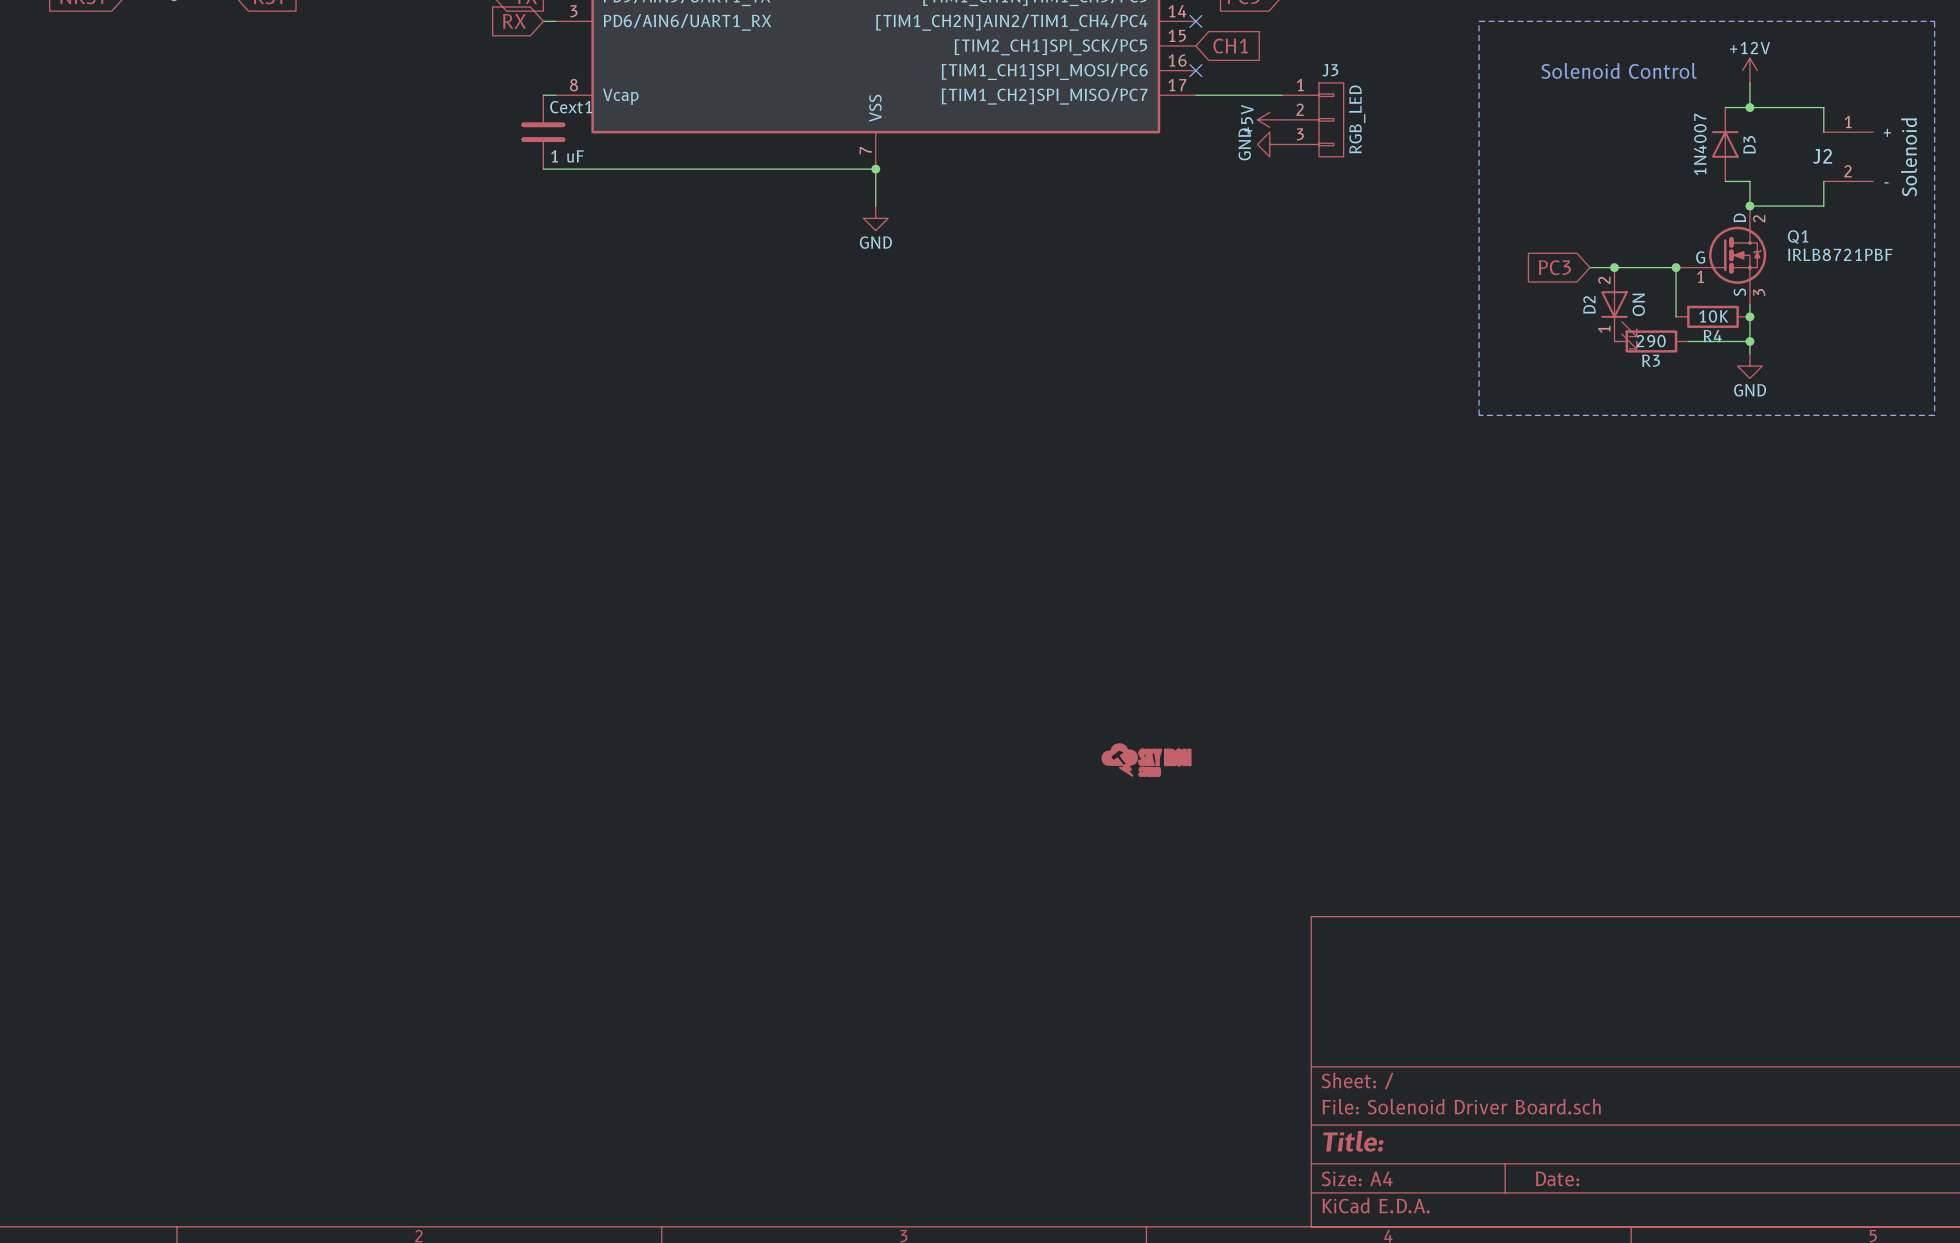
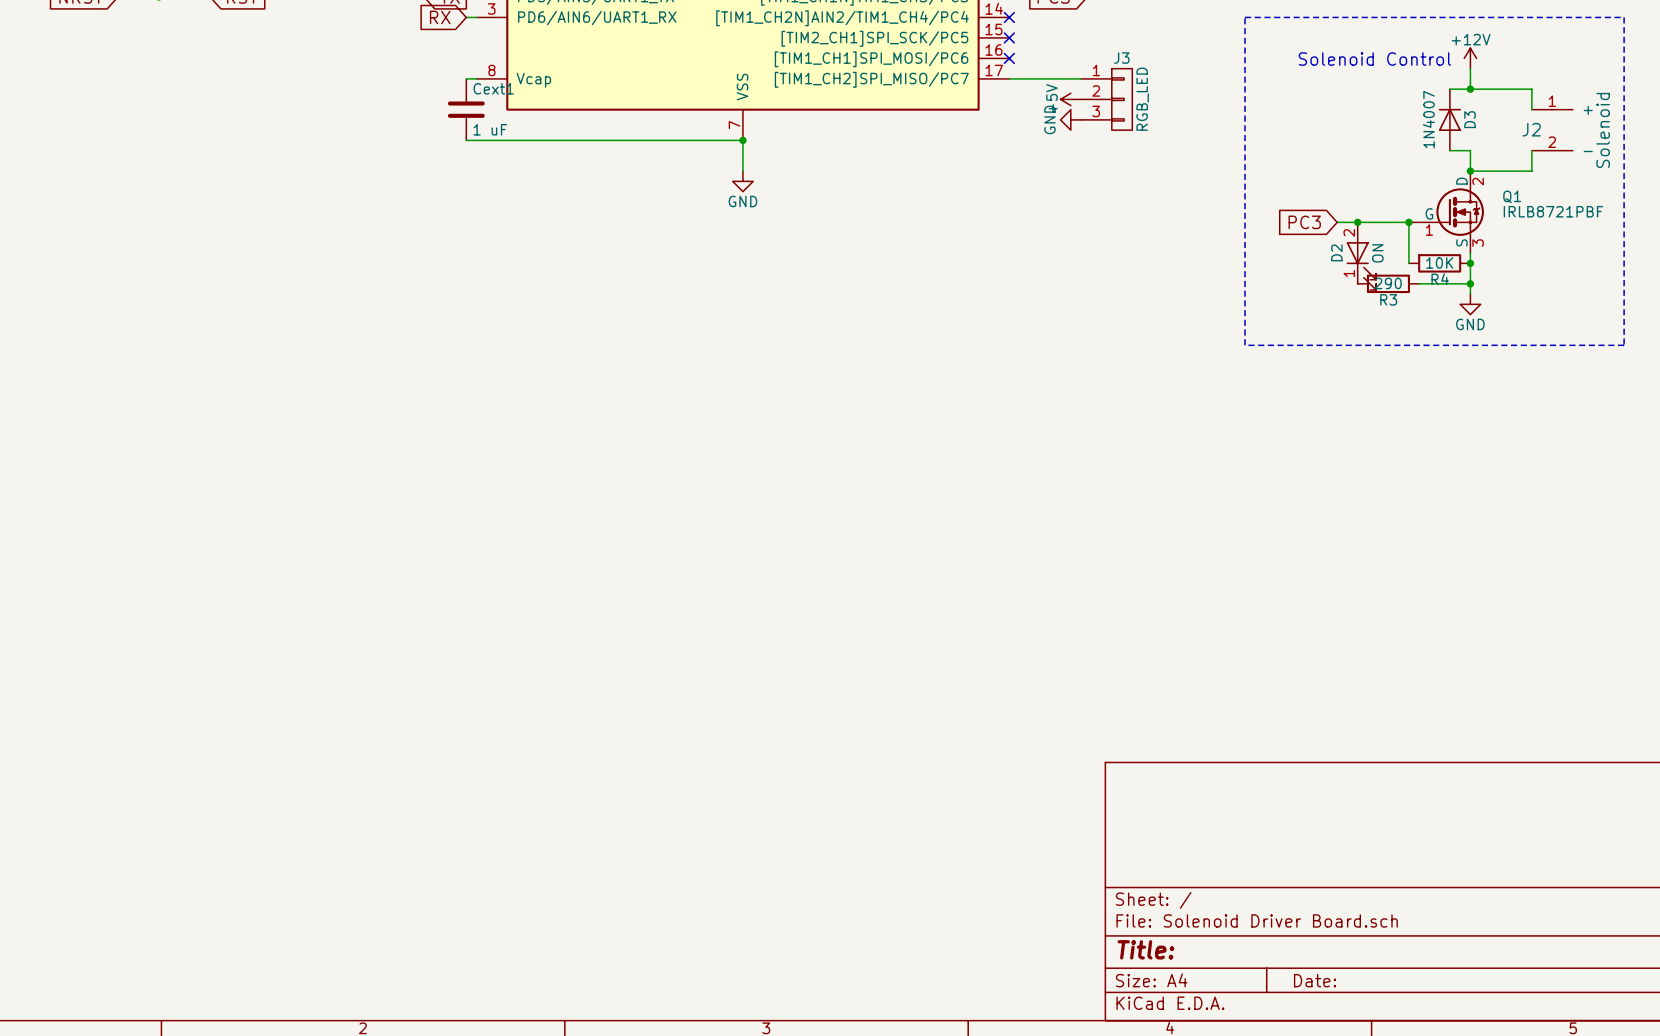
no-connect mark: none -> (1009, 37)
global label: CH1 (1230, 46) -> none
power symbol: (1146, 760) -> none

